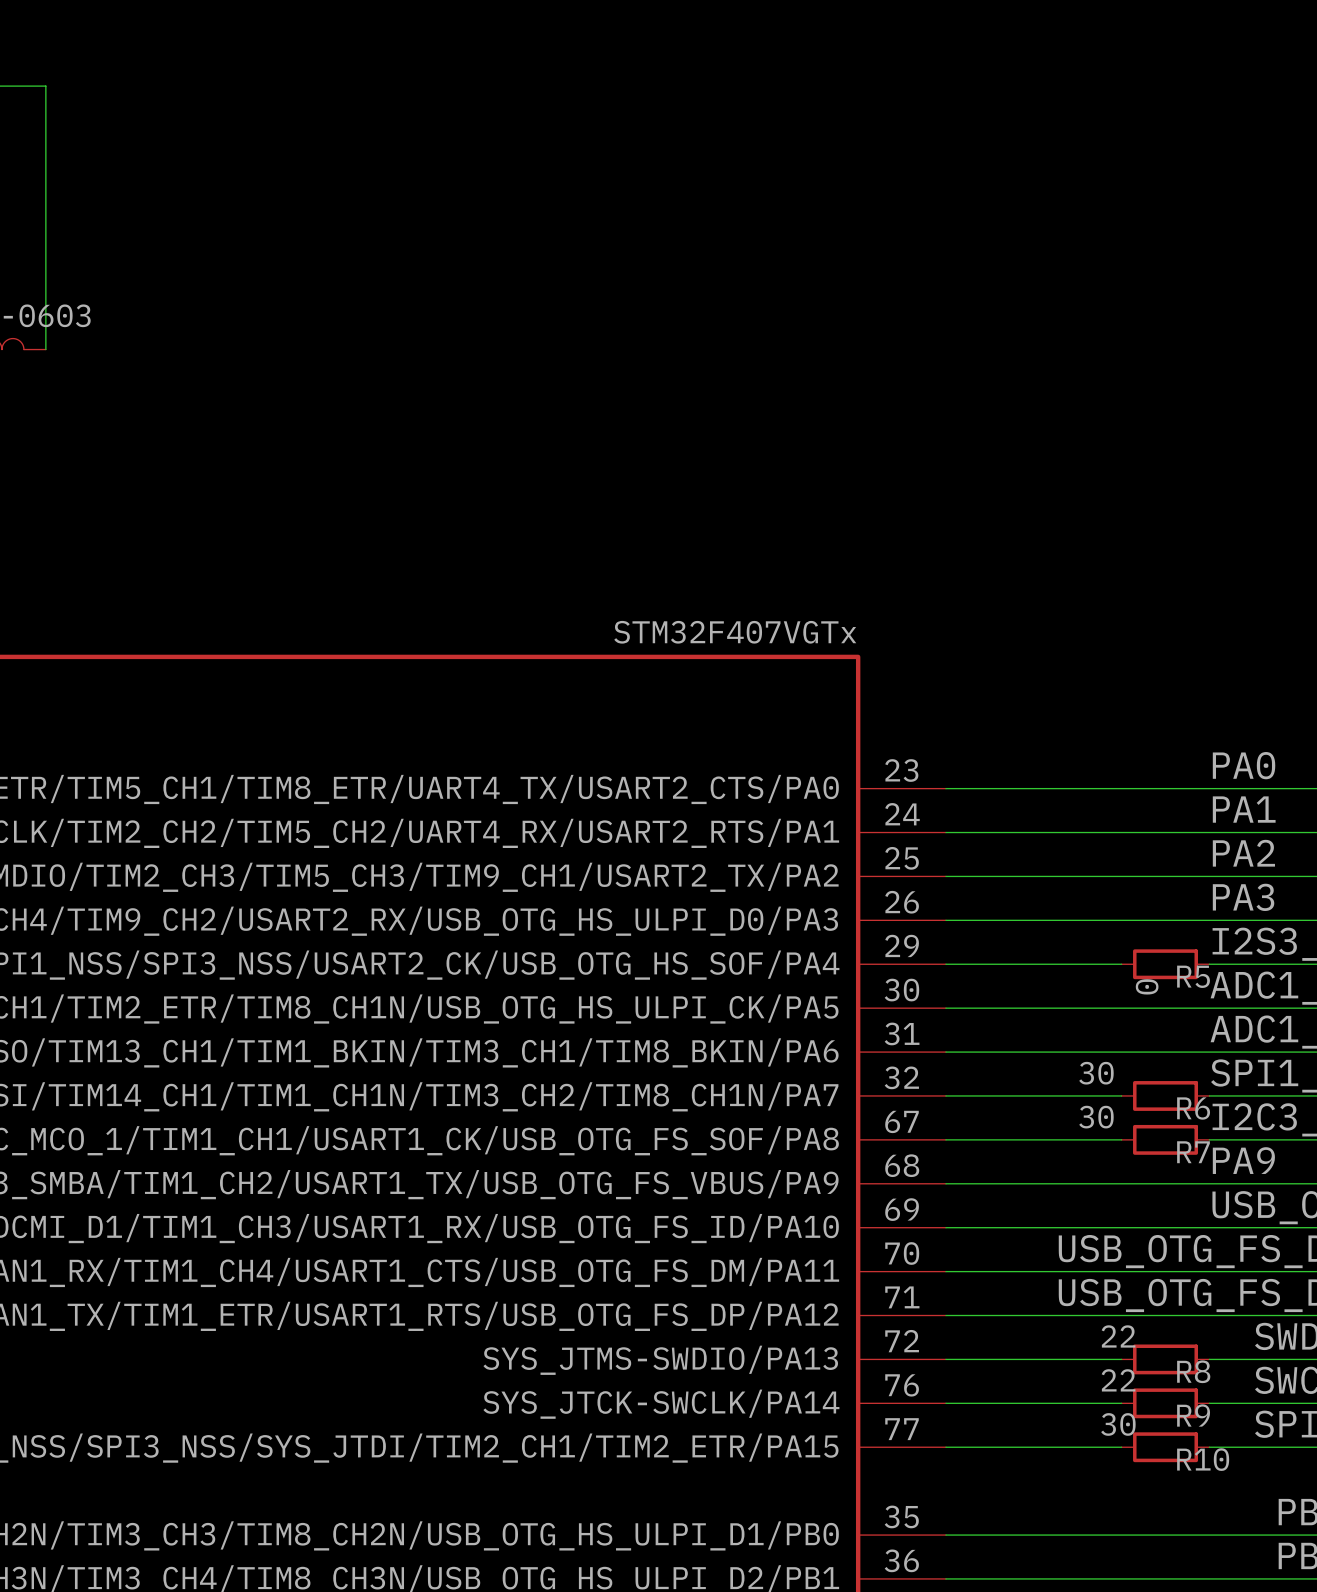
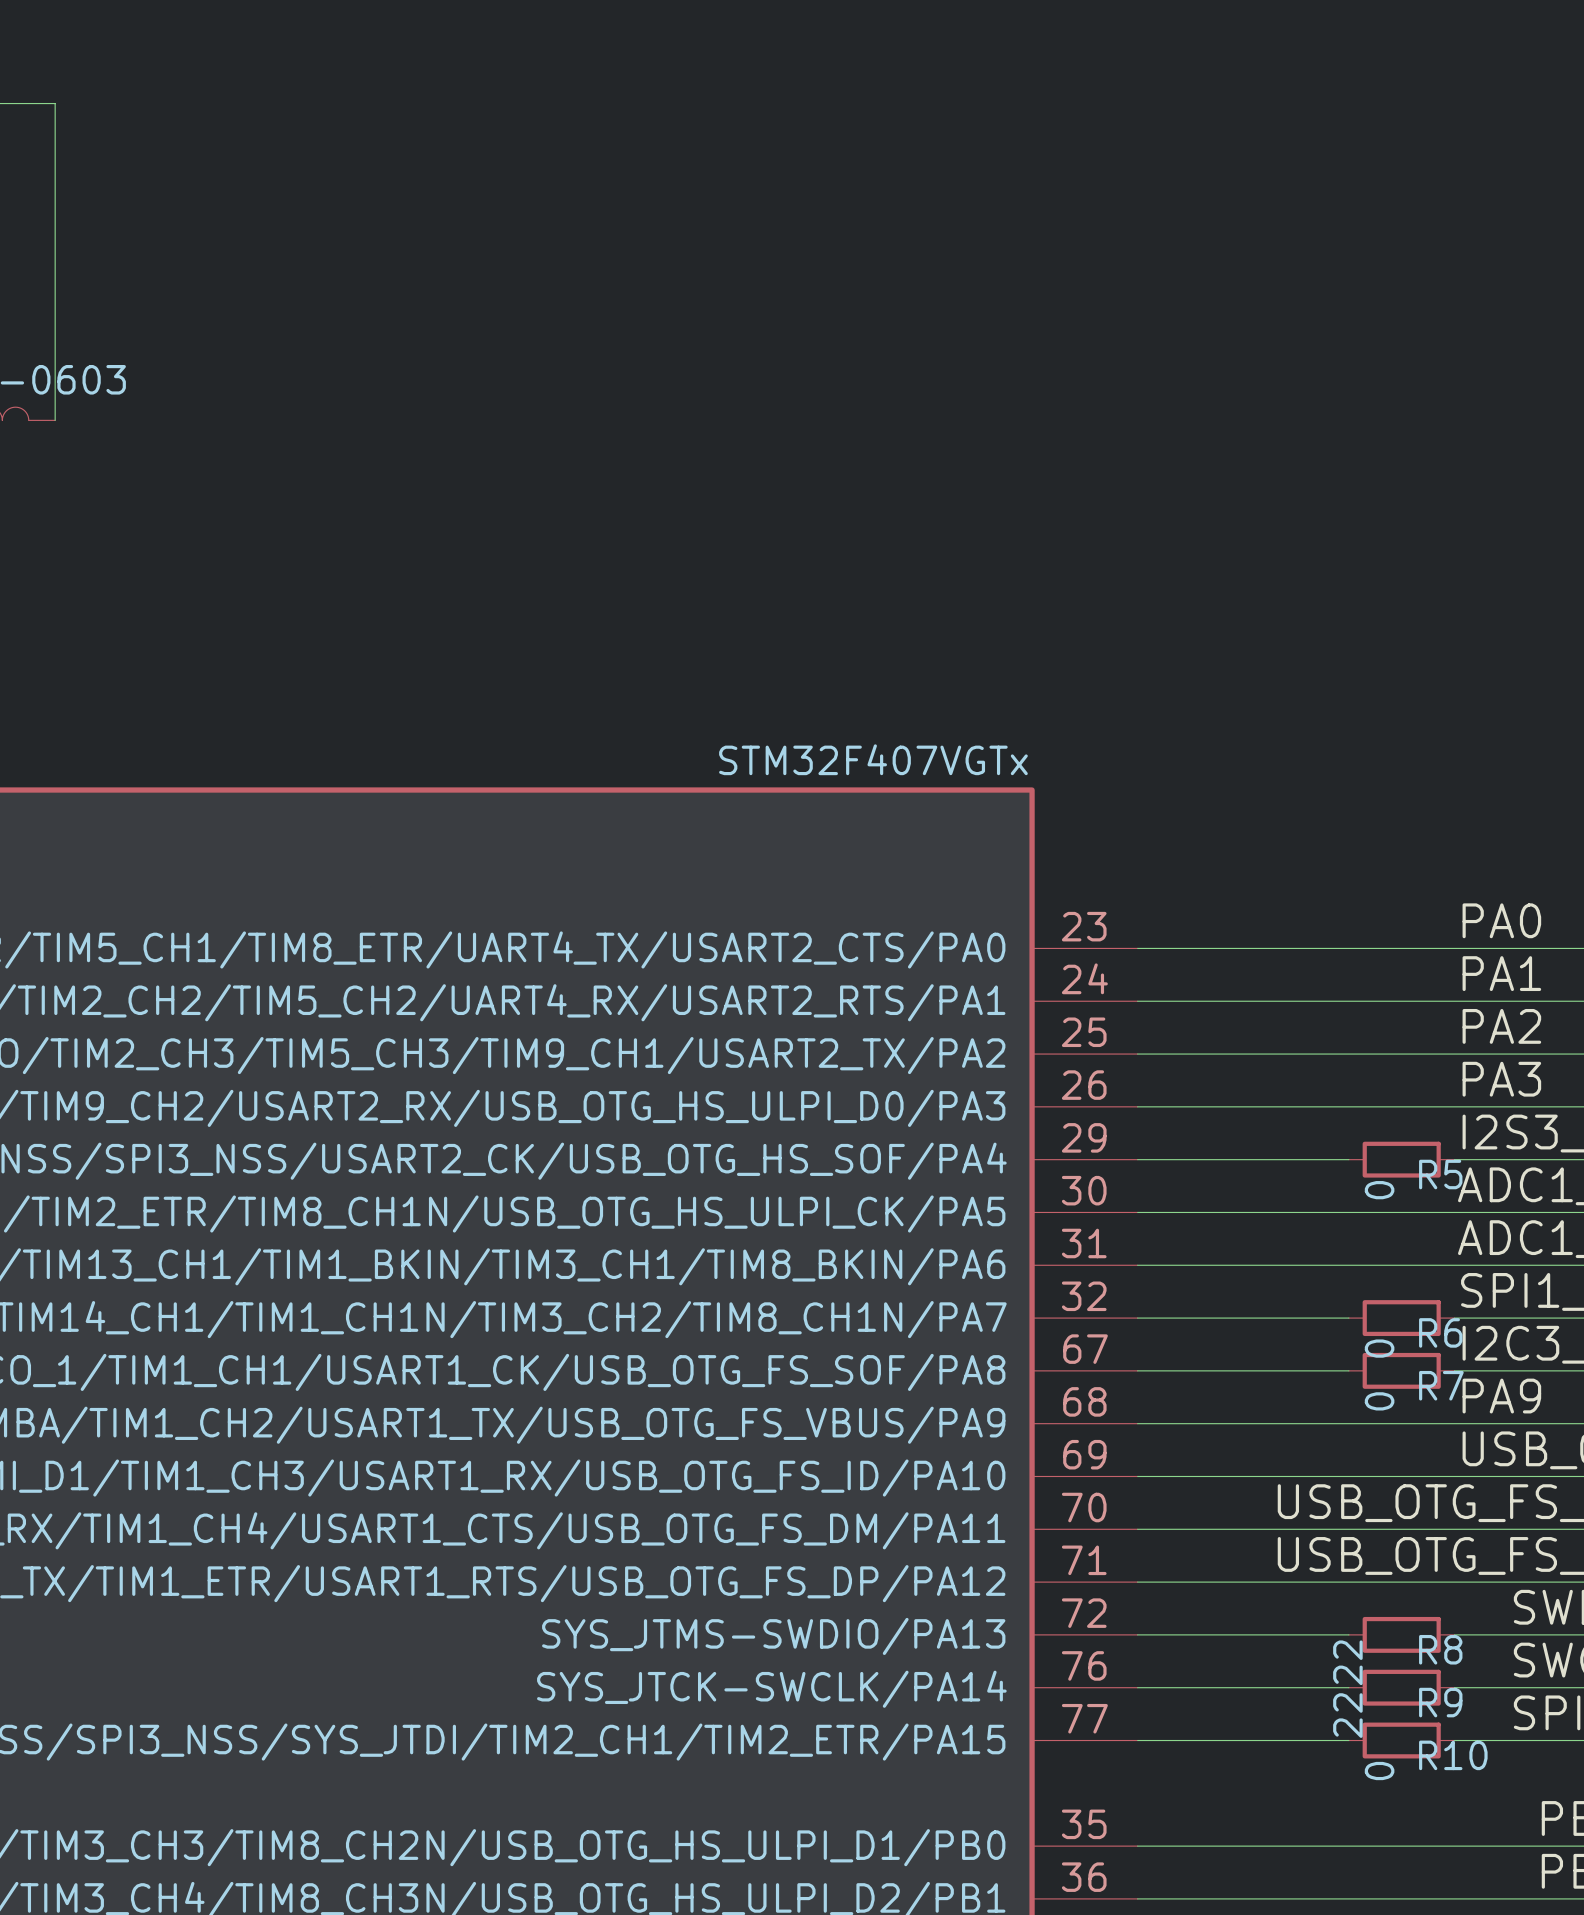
R6 value: 30 (1096, 1073) -> 0 (1379, 1348)
R7 value: 30 (1096, 1117) -> 0 (1379, 1401)
R8 value rotation: 0° (1118, 1336) -> 90° counterclockwise (1347, 1662)
R9 value rotation: 0° (1118, 1380) -> 90° counterclockwise (1347, 1715)
R10 value: 30 (1118, 1424) -> 0 (1379, 1771)

